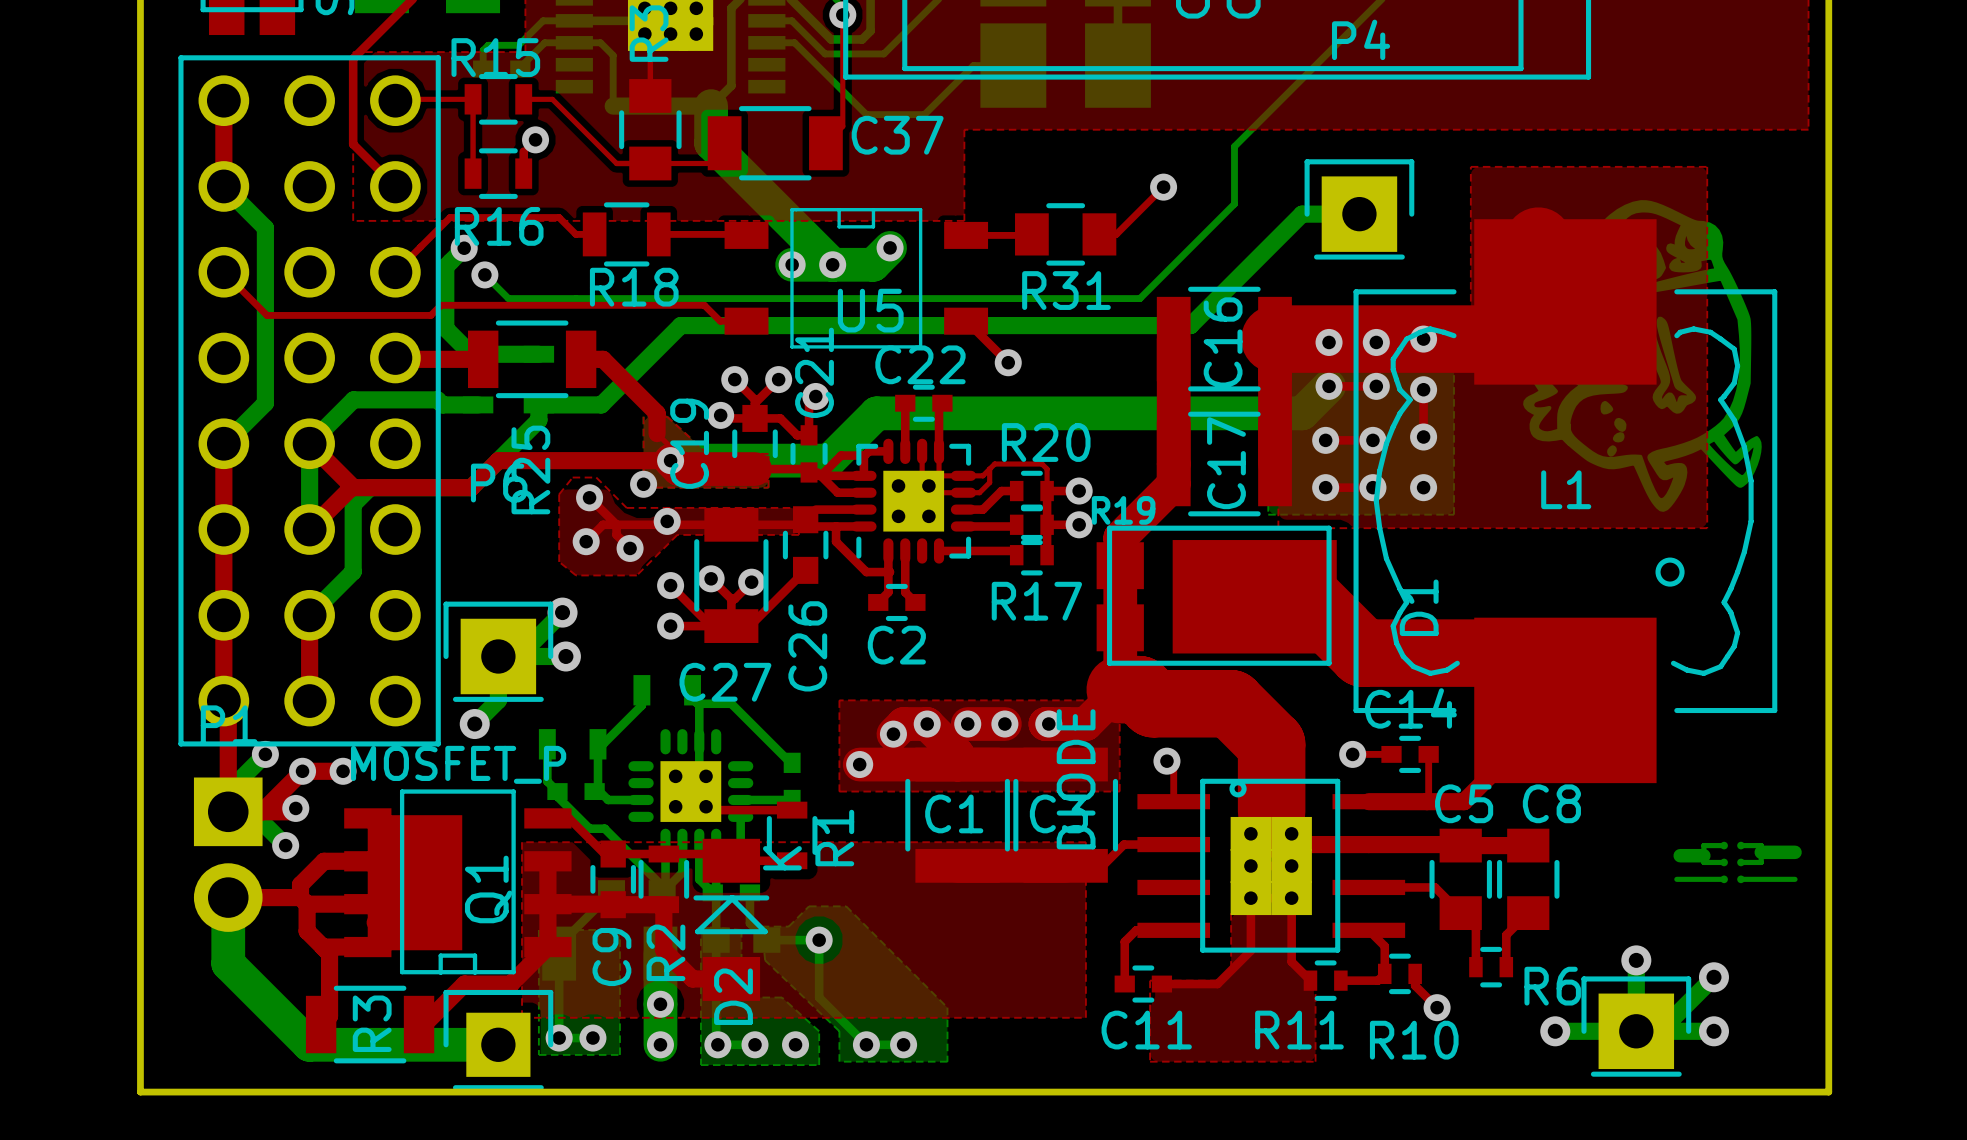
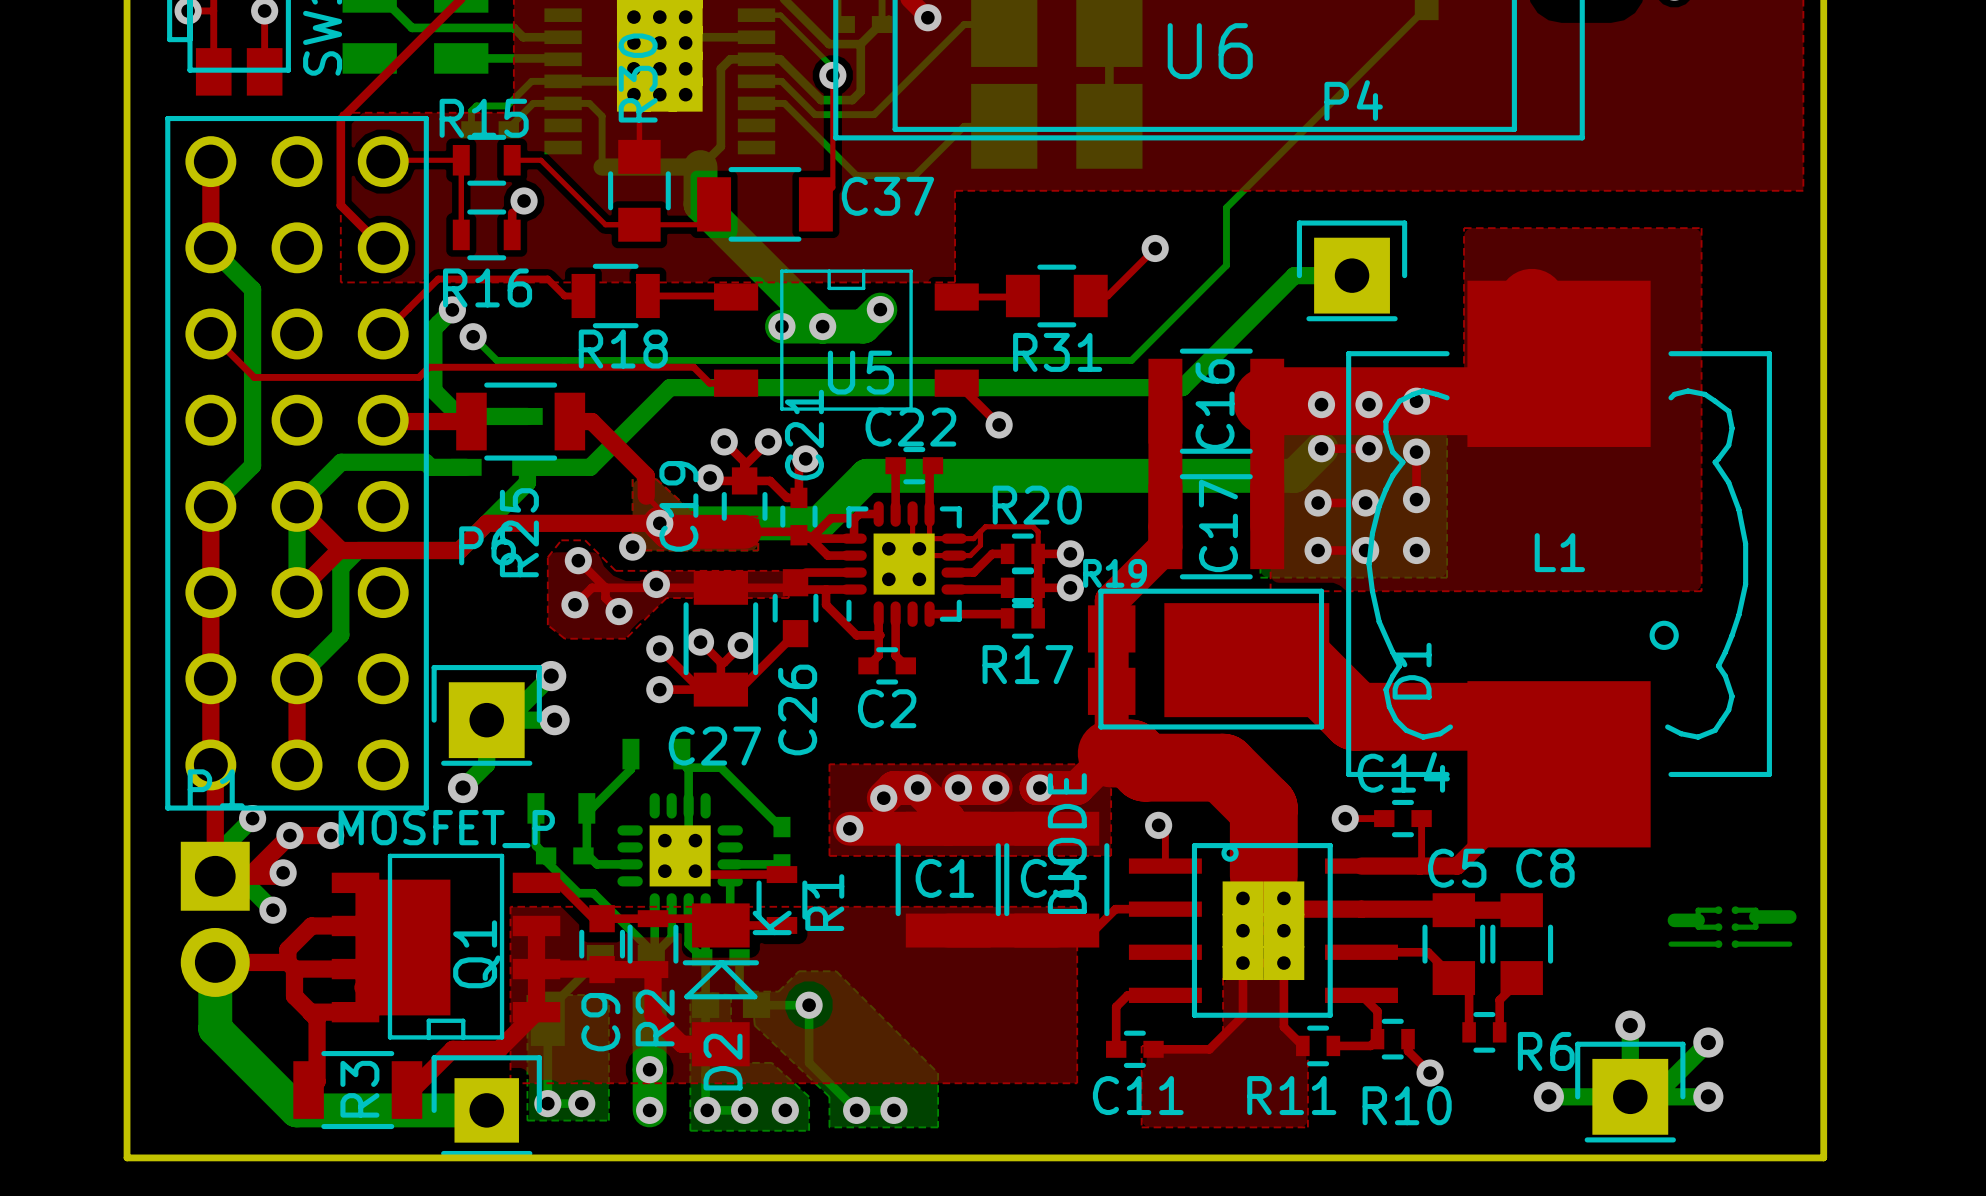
drawing: [1511, 200, 1762, 512] -> none

